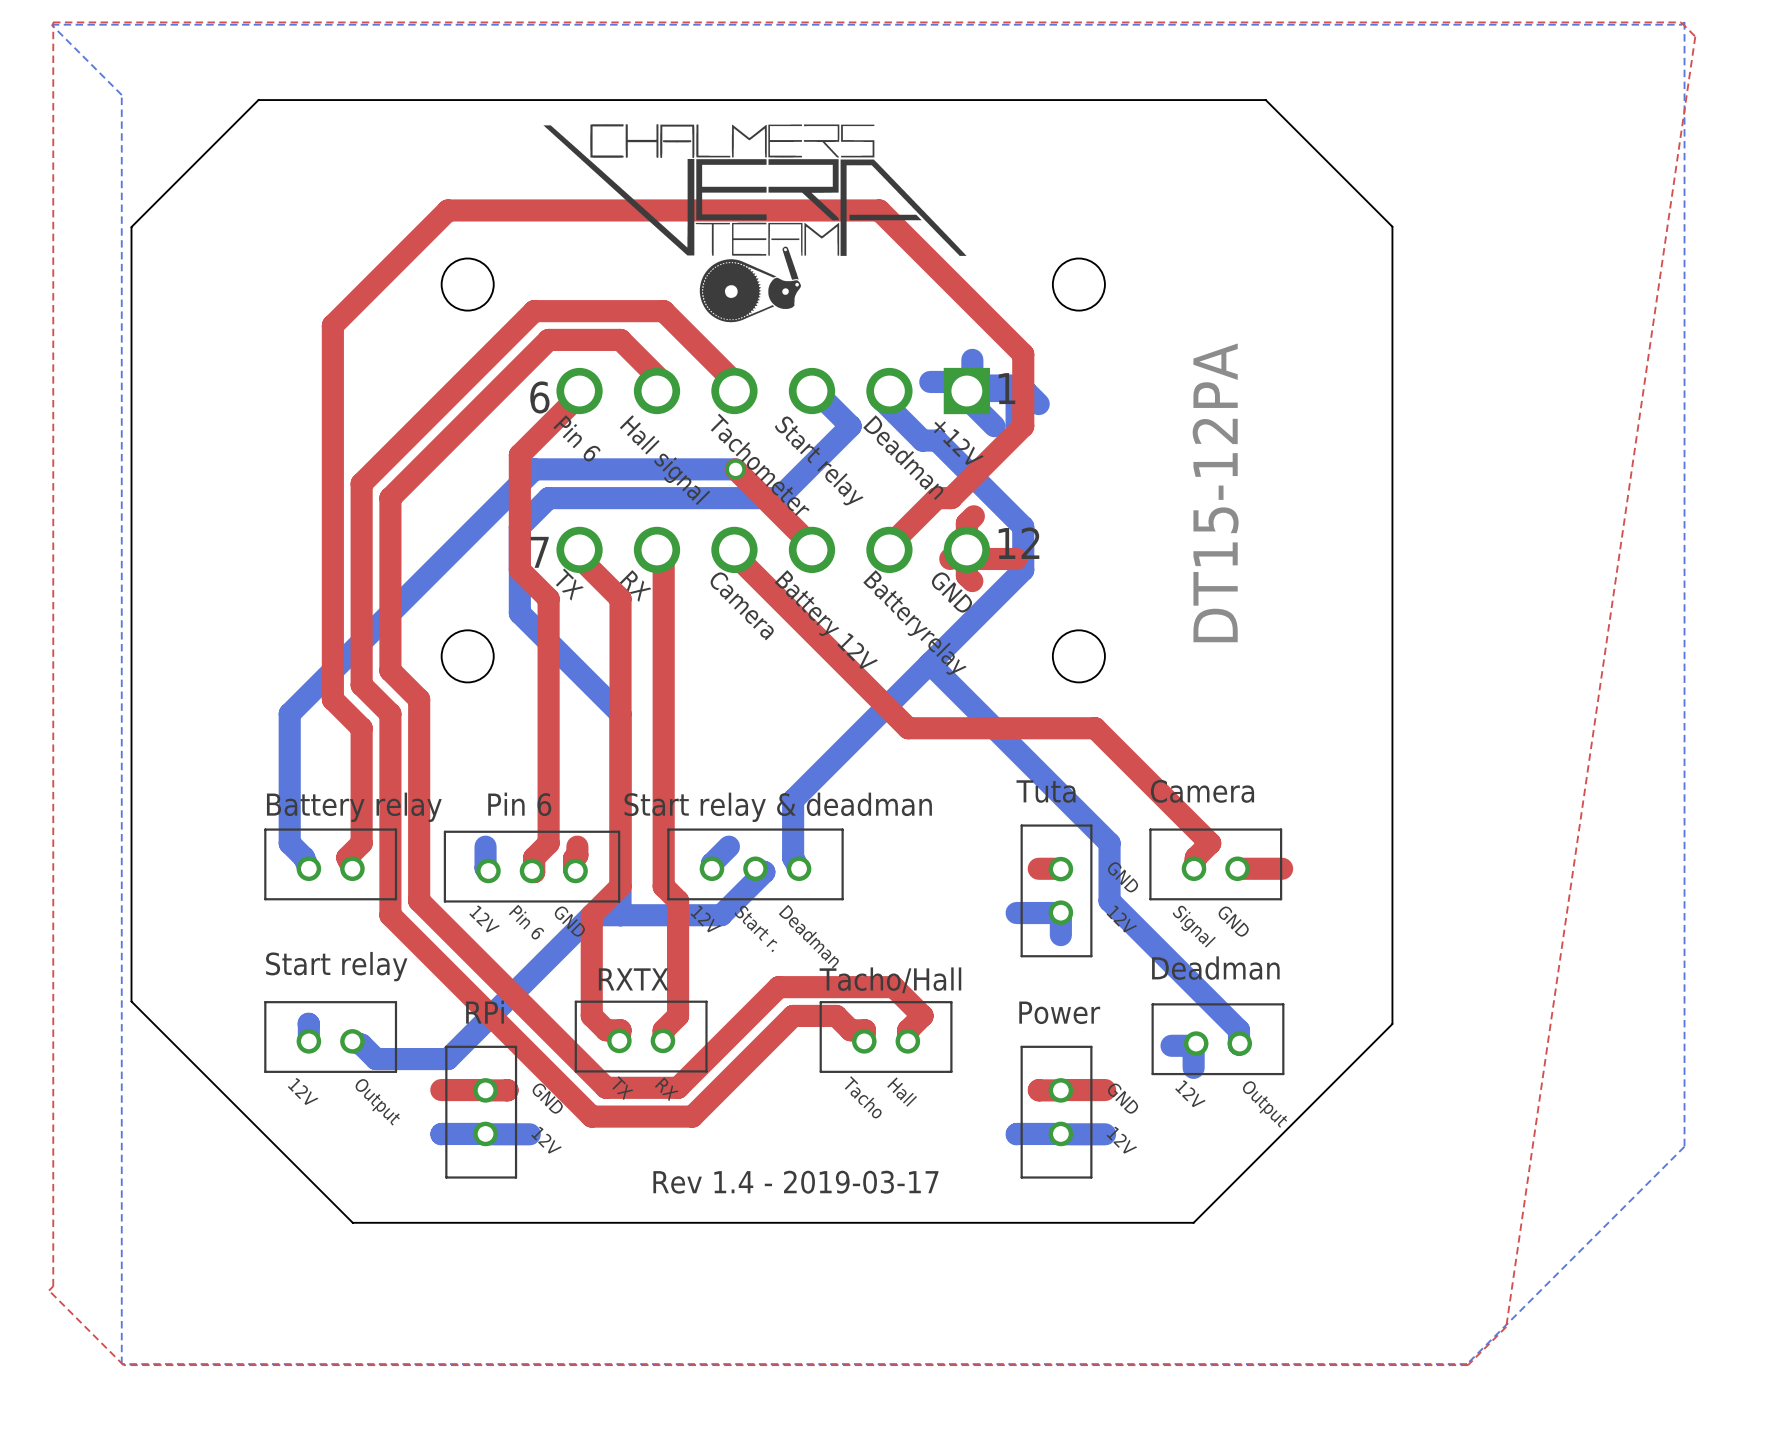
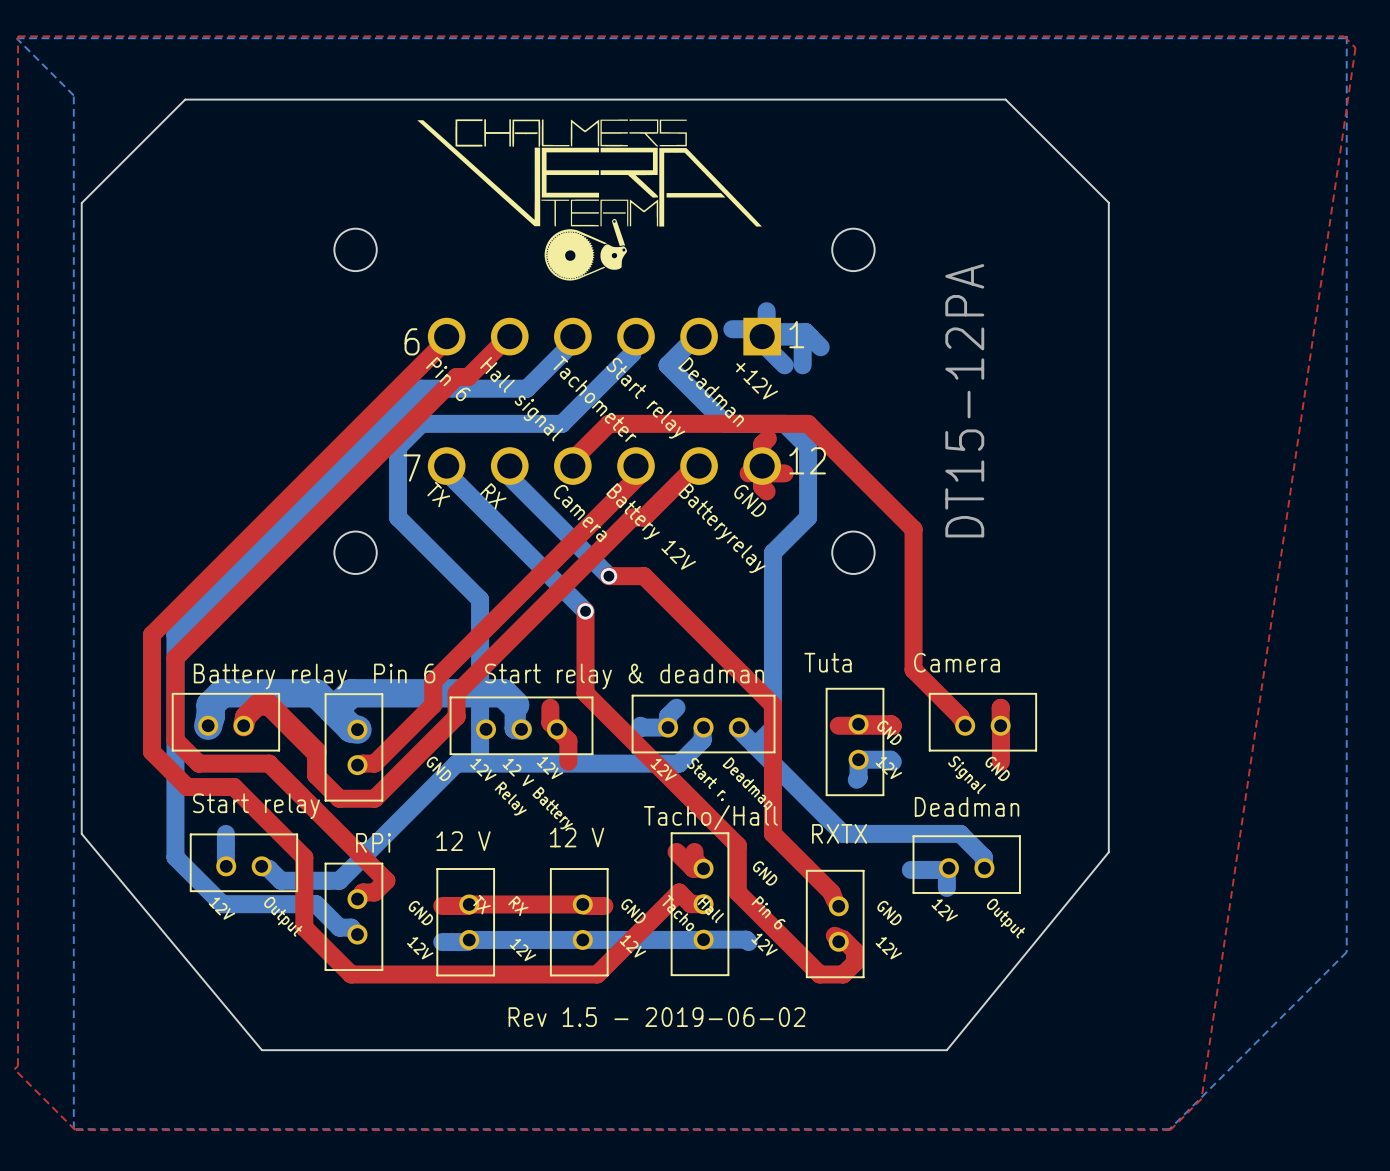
top track: (656, 391) (663, 383) (620, 339) (548, 339) (390, 498) (390, 670) (419, 699) (419, 900) (606, 1087) (678, 1087) (778, 987) (893, 987) (922, 1015) (908, 1030) (907, 1041) -> (509, 336) (468, 376) (456, 376) (175, 658) (175, 740) (198, 763) (269, 763) (386, 880) (374, 892) (362, 892) (357, 899)
top track: (734, 391) (735, 383) (663, 311) (534, 311) (361, 483) (361, 685) (390, 713) (390, 915) (591, 1116) (692, 1116) (793, 1015) (836, 1015) (850, 1030) (865, 1030) (864, 1041) -> none
bottom track: (811, 391) (821, 397) (850, 426) (778, 498) (721, 498) -> (636, 336) (632, 341) (632, 353) (562, 423)
bottom track: (879, 397) (922, 440) (936, 440) (994, 498) -> (690, 341) (667, 365) (726, 423) (784, 423)
top track: (519, 454) (519, 570) (548, 598) (548, 843) (534, 857) (534, 872) (532, 870) -> (398, 388) (152, 634) (152, 751) (187, 787) (234, 787) (304, 857) (304, 927) (351, 974) (597, 974) (679, 892) (690, 904) (703, 904)
bottom track: (534, 469) (735, 469) -> (409, 400) (421, 388) (526, 388) (573, 341) (572, 336)
top track: (735, 469) (807, 541) (811, 549) -> (357, 765) (374, 763) (433, 705) (433, 681) (644, 470) (636, 466)
via: (735, 469) -> none
top track: (936, 498) (893, 541) (889, 549) -> (737, 423) (608, 423) (573, 459) (572, 466)
top track: (951, 498) (1023, 426) (1023, 354) (879, 210) (447, 210) (332, 325) (332, 699) (361, 728) (361, 843) (347, 857) (352, 868) -> (749, 423) (808, 423) (913, 529) (913, 669) (960, 716) (965, 725)
bottom track: none -> (446, 466) (444, 470) (585, 611)
top track: (579, 549) (577, 555) (620, 598) (620, 886) (591, 915) (591, 1015) (606, 1030) (620, 1030) (619, 1040) -> none
bottom track: none -> (509, 466) (503, 470) (608, 576)
top track: (656, 549) (663, 555) (663, 886) (678, 900) (678, 1015) (663, 1030) (662, 1040) -> none
top track: (734, 549) (735, 555) (908, 728) (1095, 728) (1210, 843) (1195, 857) (1193, 868) -> none
top track: none -> (699, 466) (690, 470) (644, 517) (632, 517) (456, 693) (456, 716) (374, 798) (339, 798) (316, 775) (316, 751) (269, 705) (257, 705) (245, 716) (243, 725)
top track: (994, 558) (1016, 558) -> none
bottom track: (1023, 570) (793, 800) (793, 857) (799, 868) -> (808, 482) (808, 517) (772, 552) (772, 728) (755, 746)
bottom track: (929, 663) (1109, 843) (1109, 900) (1210, 1001) -> (739, 727) (737, 728) (843, 833) (960, 833)
top track: none -> (608, 576) (644, 576) (772, 705) (772, 833) (831, 892) (834, 900)
via: none -> (608, 576)
bottom track: (289, 713) (289, 843) (304, 857) (308, 868) -> (210, 599) (175, 634) (175, 857) (222, 904) (316, 904) (339, 927) (351, 927) (357, 934)
top track: none -> (585, 611) (585, 693) (737, 845) (737, 892) (819, 974) (843, 974) (854, 962) (854, 951) (843, 939) (834, 935)
via: none -> (585, 611)
bottom track: (485, 846) (485, 868) (488, 870) -> none
top track: (577, 846) (577, 855) (574, 858) (575, 870) -> none
top track: none -> (550, 707) (550, 722) (568, 740) (568, 761)
bottom track: (728, 846) (711, 863) (711, 868) -> none
bottom track: none -> (676, 707) (668, 716) (668, 727) (642, 727) (640, 725)
top track: none -> (1000, 707) (1000, 761)
bottom track: none -> (333, 710) (351, 693) (503, 693) (515, 705) (515, 728) (521, 729)
part position: (330, 864) -> (225, 722)
part: (755, 864) -> none
part position: (1215, 864) -> (982, 722)
part: (532, 866) -> none
part: none -> (703, 724)
top track: none -> (858, 724) (891, 724) (892, 725) (860, 725) (858, 724)
bottom track: none -> (208, 725) (210, 705) (222, 693) (316, 693) (351, 728) (357, 729)
part: none -> (521, 725)
bottom track: (755, 868) (764, 872) (721, 915) -> (703, 727) (702, 740) (679, 763) (562, 763)
top track: (1038, 868) (1060, 869) -> (858, 724) (838, 725)
top track: (1237, 868) (1282, 868) -> none
part position: (1056, 890) -> (855, 741)
part: none -> (353, 747)
bottom track: (1016, 913) (1060, 912) (1060, 935) -> none
bottom track: none -> (892, 761) (890, 759) (858, 759) (858, 778) (856, 779)
text: 12V (484, 918) -> none
text: none -> 12V (663, 769)
text position: GND (1233, 921) -> GND (997, 768)
text: Pin 6 (526, 922) -> none
text position: Signal (1194, 926) -> Signal (967, 775)
text position: Start r. (755, 928) -> Start r. (706, 779)
text position: Deadman (808, 936) -> Deadman (747, 783)
text: none -> 12V Relay (498, 787)
text: none -> 12 V Battery (537, 794)
text position: RXTX (633, 979) -> RXTX (839, 833)
board edge: (131, 1001) (352, 1222) (1193, 1222) (1392, 1024) -> (81, 833) (261, 1050) (946, 1050) (1108, 852)
text: none -> 12 V (577, 837)
text: none -> 12 V (463, 841)
text: Power (1059, 1012) -> none
bottom track: (308, 1023) (308, 1041) -> (225, 833) (226, 866)
top track: none -> (676, 851) (693, 868) (703, 868) (694, 859) (694, 851)
part: (641, 1036) -> none
part: (886, 1037) -> none
bottom track: none -> (910, 869) (928, 869)
text: none -> GND (765, 873)
part: none -> (700, 904)
top track: (441, 1090) (507, 1090) -> none
top track: none -> (442, 906) (469, 904) (604, 906)
top track: (1038, 1090) (1105, 1090) -> none
text: none -> Pin 6 (768, 912)
text: none -> GND (633, 911)
part: none -> (465, 922)
part: none -> (579, 922)
part position: (481, 1112) -> (353, 916)
bottom track: (441, 1134) (529, 1134) -> none
bottom track: none -> (442, 942) (467, 942) (469, 939) (703, 939) (746, 939) (748, 942)
bottom track: (1016, 1134) (1105, 1134) -> none
text: none -> 12V (764, 944)
text: none -> 12V (632, 946)
text: none -> 12V (522, 950)
text: Rev 1.4 - 2019-03-17 (795, 1182) -> Rev 1.5 - 2019-06-02 (657, 1017)

